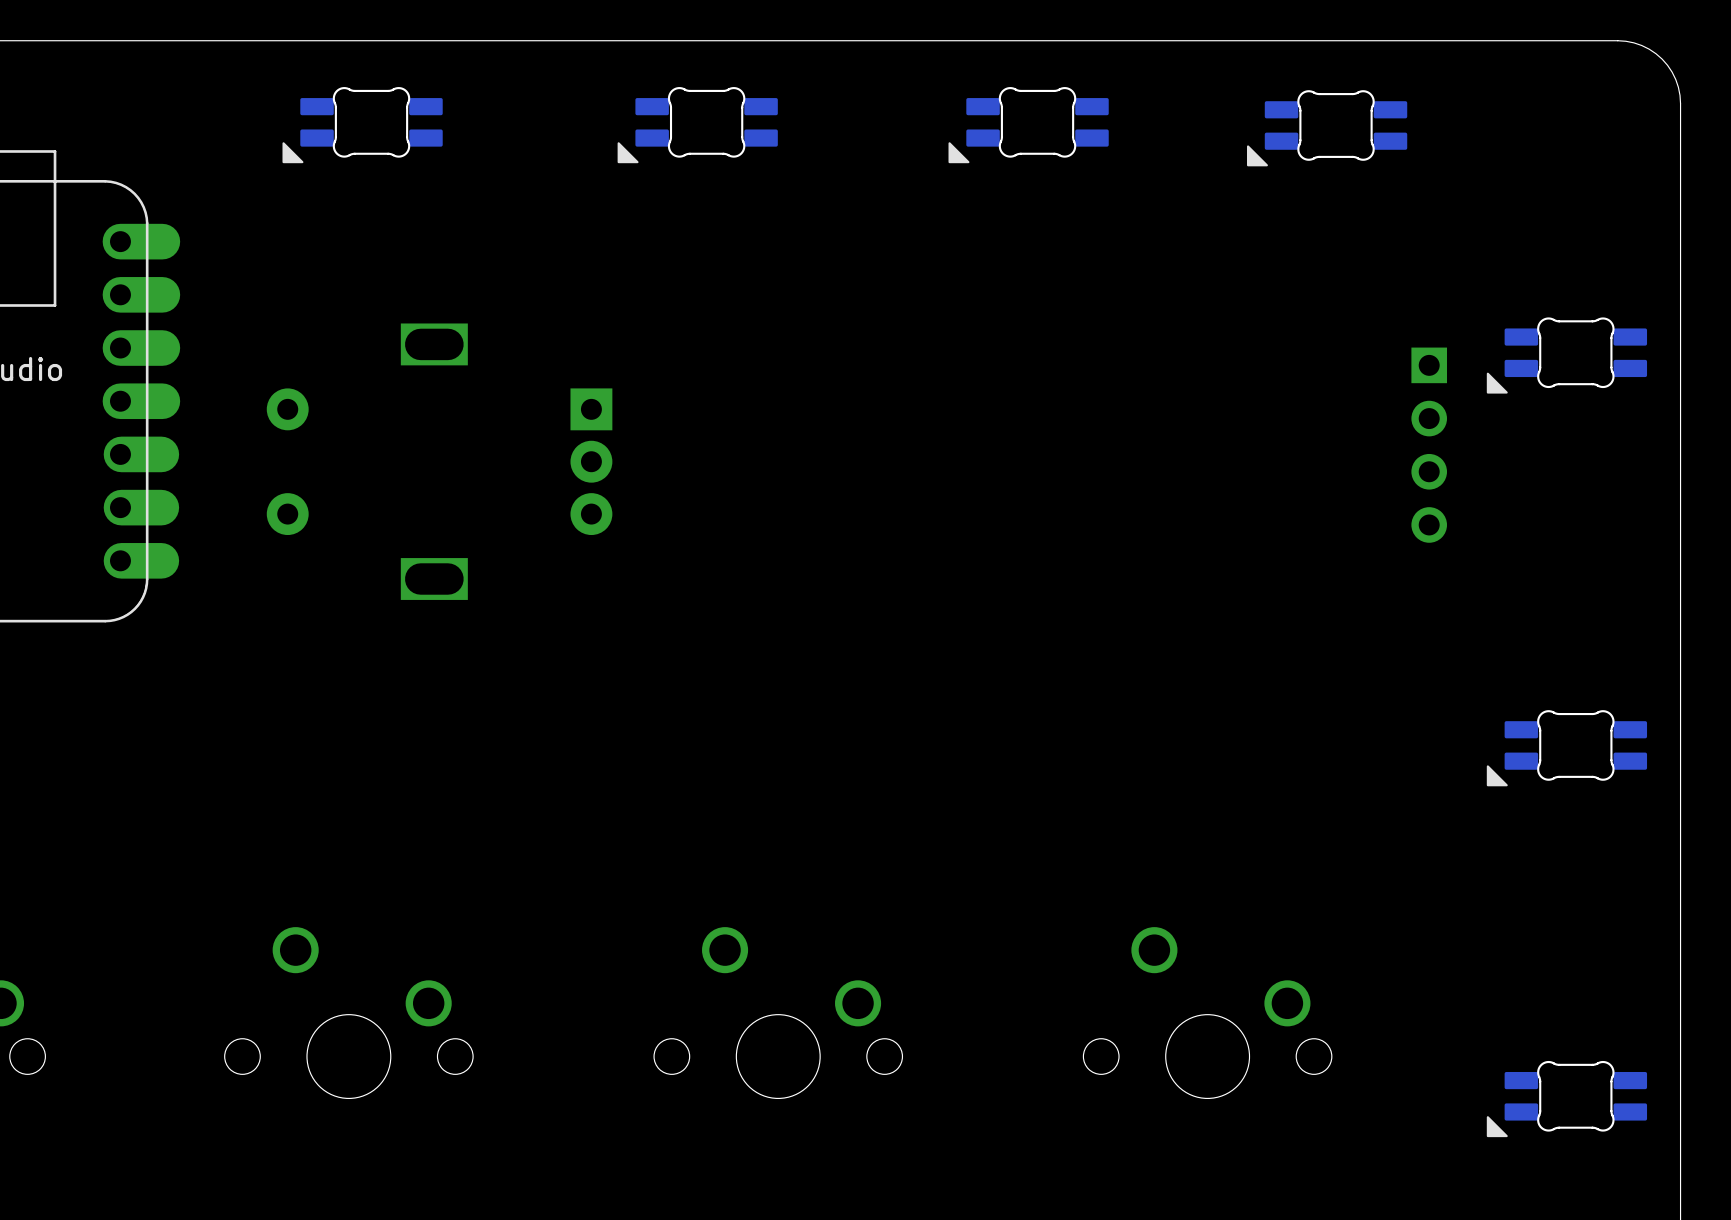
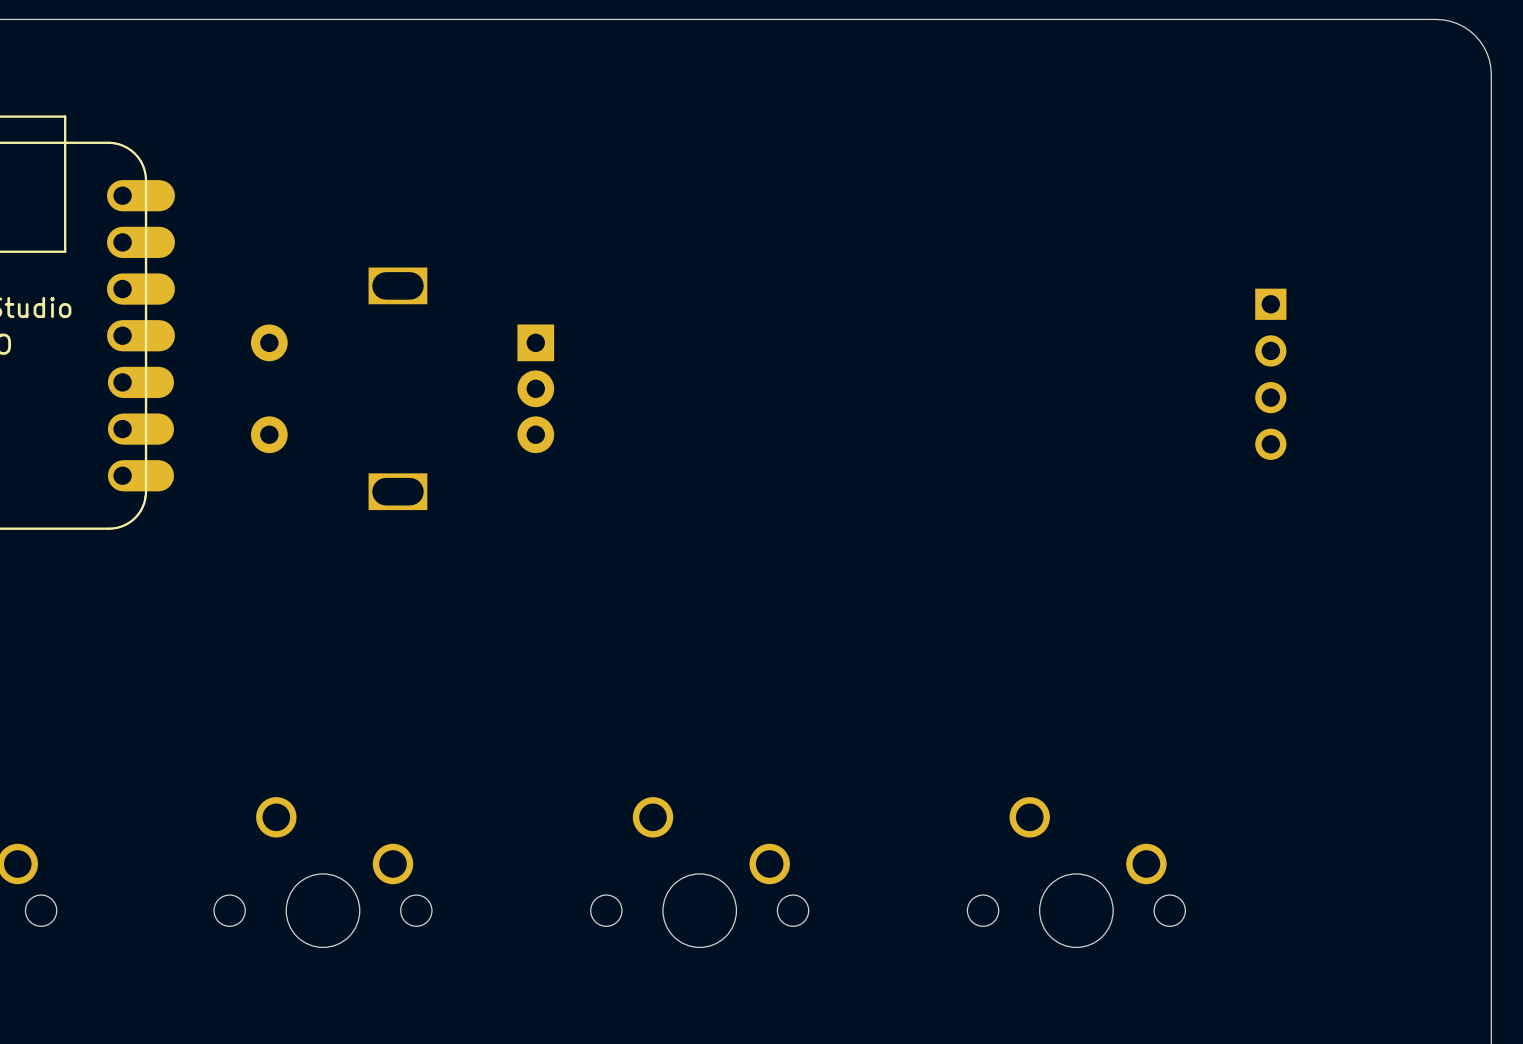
part: (362, 125) -> none
part: (697, 125) -> none
part: (1028, 125) -> none
part: (1327, 128) -> none
part: (1566, 355) -> none
part: (1566, 748) -> none
part: (1566, 1099) -> none

